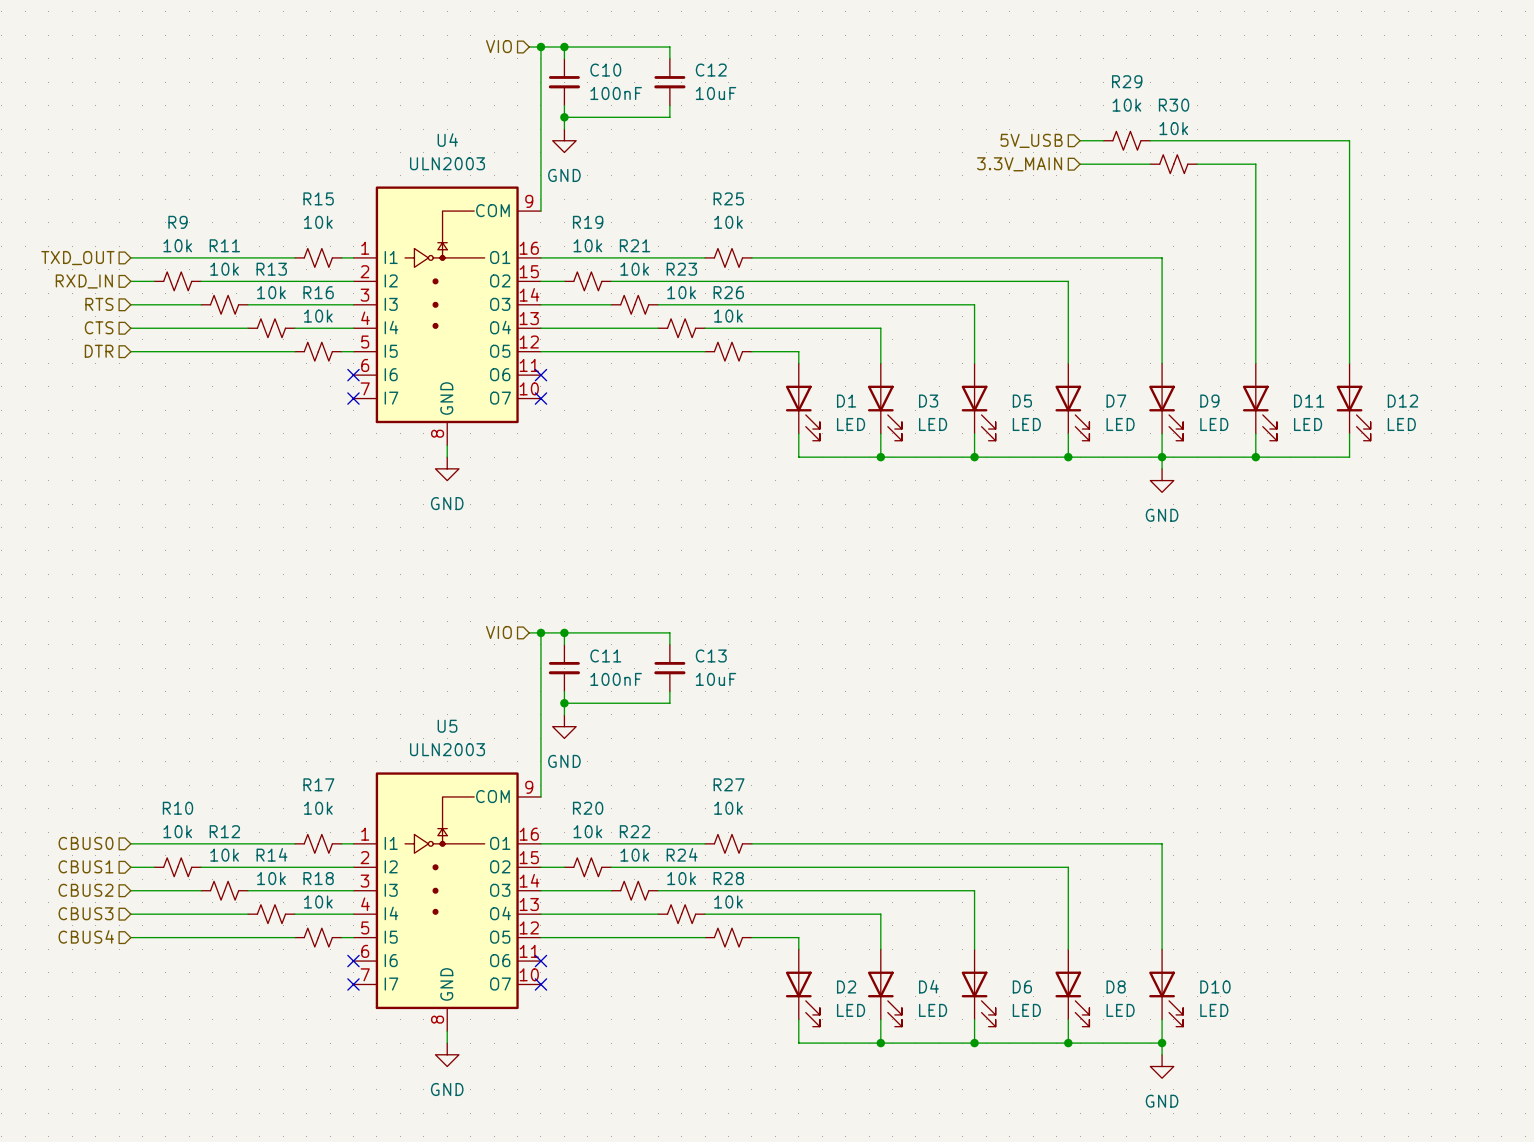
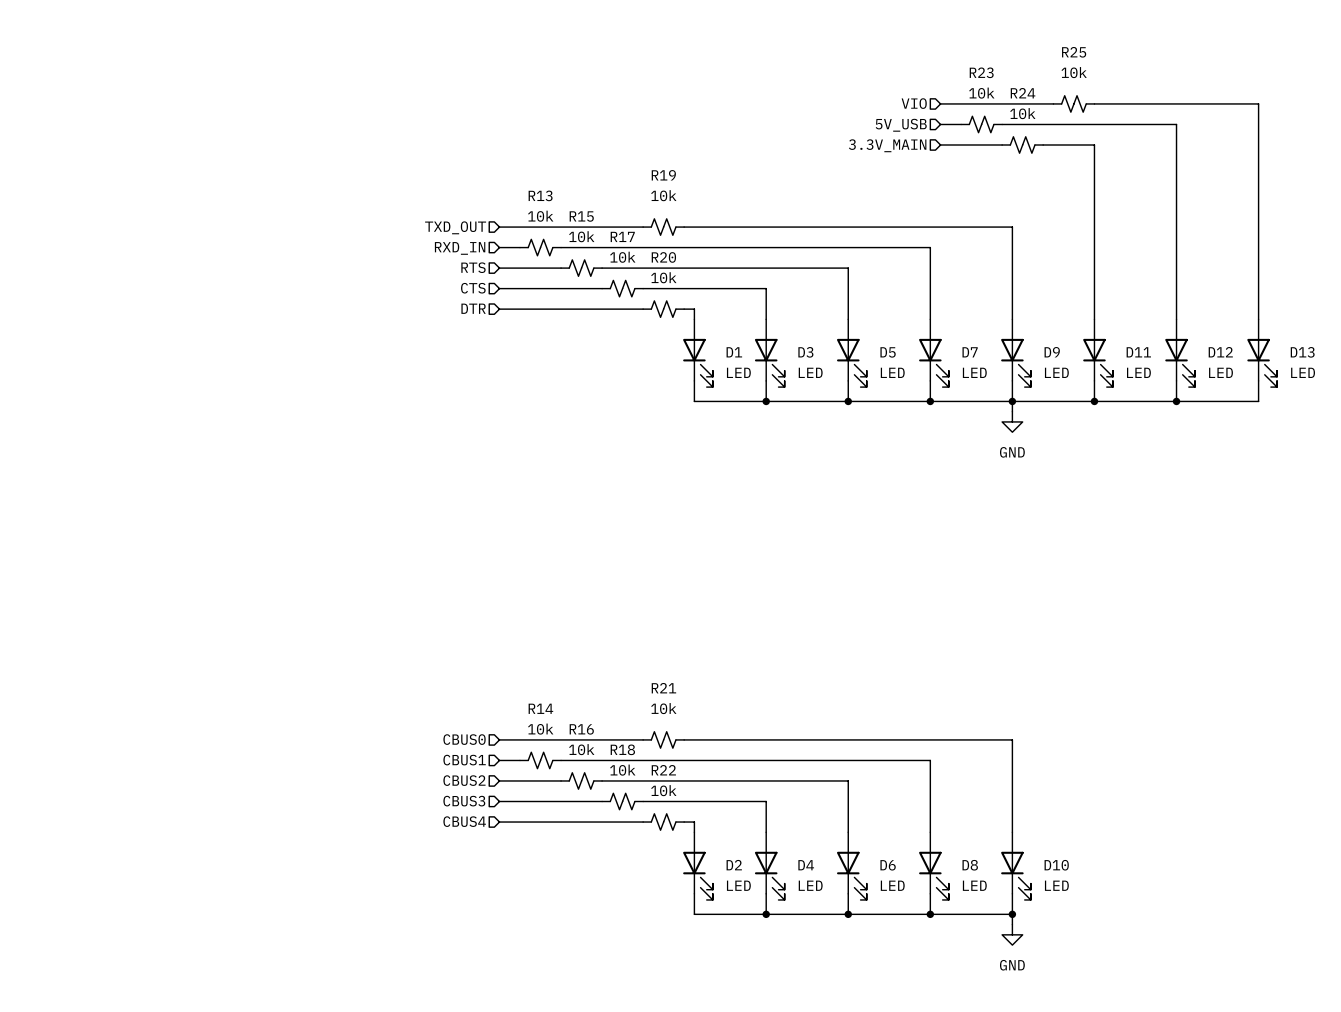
hierarchical label: VIO (498, 46) -> none
wire: (529, 47) (669, 47) (669, 58) -> none
wire: (540, 47) (540, 211) -> none
junction: (540, 47) -> none
wire: (564, 47) (564, 58) -> none
junction: (564, 47) -> none
R29 name: R29 (1127, 81) -> R23 (981, 72)
C10: 100nF (564, 82) -> none
C12: 10uF (669, 82) -> none
wire: (564, 105) (564, 129) -> none
wire: (669, 105) (669, 117) (564, 117) -> none
R30 name: R30 (1174, 105) -> R24 (1023, 93)
hierarchical label: none -> VIO (914, 103)
junction: (564, 117) -> none
wire: none -> (940, 103) (1053, 103)
wire: none -> (1094, 103) (1258, 103) (1258, 319)
power symbol: GND (564, 140) -> none
wire: (130, 257) (294, 257) -> none
R15 position: (318, 257) -> (581, 268)
wire: (341, 257) (353, 257) -> none
wire: (540, 257) (576, 257) -> none
R25 position: (728, 257) -> (1073, 103)
wire: (751, 257) (787, 257) -> (612, 227) (643, 227)
hierarchical label: TXD_OUT (77, 258) -> none
hierarchical label: none -> TXD_OUT (455, 227)
hierarchical label: RXD_IN (84, 281) -> none
wire: (130, 281) (154, 281) -> none
R9: 10k (177, 281) -> none
wire: (201, 281) (353, 281) -> none
hierarchical label: none -> RXD_IN (460, 248)
wire: (540, 281) (564, 281) -> (499, 247) (520, 247)
R19 position: (587, 281) -> (663, 227)
wire: (611, 281) (646, 281) -> none
hierarchical label: RTS (99, 304) -> none
wire: (130, 304) (201, 304) -> none
R11: 10k (224, 304) -> none
wire: (248, 304) (353, 304) -> none
wire: (540, 304) (576, 304) -> none
hierarchical label: none -> RTS (473, 267)
R21 position: (634, 304) -> (663, 739)
wire: (658, 304) (693, 304) -> (530, 268) (561, 268)
U4: ULN2003 (447, 315) -> none
hierarchical label: CTS (99, 327) -> none
hierarchical label: none -> CTS (473, 288)
wire: (130, 328) (248, 328) -> none
R13 position: (271, 328) -> (540, 247)
wire: (294, 328) (353, 328) -> none
wire: (540, 328) (576, 328) -> none
R23: 10k (681, 328) -> none
wire: (705, 328) (740, 328) -> (571, 288) (602, 288)
hierarchical label: DTR (99, 351) -> none
wire: (130, 351) (294, 351) -> none
R16 position: (318, 351) -> (581, 780)
wire: (341, 351) (353, 351) -> none
wire: (540, 351) (576, 351) -> none
hierarchical label: none -> DTR (473, 308)
R26: 10k (728, 351) -> none
wire: (751, 351) (787, 351) -> (612, 309) (643, 309)
no-connect mark: (353, 375) -> none
no-connect mark: (540, 375) -> none
no-connect mark: (353, 398) -> none
no-connect mark: (540, 398) -> none
D13: none -> LED (1262, 353)
wire: none -> (1258, 380) (1258, 401) (1176, 401)
wire: (447, 445) (447, 457) -> none
junction: none -> (1176, 401)
power symbol: GND (447, 468) -> none
hierarchical label: VIO (498, 632) -> none
wire: (529, 632) (669, 632) (669, 644) -> none
wire: (540, 632) (540, 796) -> none
junction: (540, 632) -> none
wire: (564, 632) (564, 644) -> none
junction: (564, 632) -> none
C11: 100nF (564, 668) -> none
C13: 10uF (669, 668) -> none
wire: (564, 691) (564, 714) -> none
wire: (669, 691) (669, 703) (564, 703) -> none
junction: (564, 703) -> none
power symbol: GND (564, 726) -> none
hierarchical label: CBUS0 (86, 843) -> none
wire: (130, 843) (294, 843) -> none
R17 position: (318, 843) -> (622, 288)
wire: (341, 843) (353, 843) -> none
hierarchical label: none -> CBUS0 (464, 739)
wire: (540, 843) (576, 843) -> none
R27: 10k (728, 843) -> none
wire: (751, 843) (787, 843) -> (612, 739) (643, 739)
hierarchical label: CBUS1 (86, 866) -> none
hierarchical label: none -> CBUS1 (464, 760)
wire: (130, 867) (154, 867) -> none
R10: 10k (177, 867) -> none
wire: (201, 867) (353, 867) -> none
wire: (540, 867) (564, 867) -> (499, 760) (520, 760)
R20 position: (587, 867) -> (663, 309)
wire: (611, 867) (646, 867) -> none
hierarchical label: CBUS2 (86, 890) -> none
wire: (130, 890) (201, 890) -> none
R12: 10k (224, 890) -> none
wire: (248, 890) (353, 890) -> none
hierarchical label: none -> CBUS2 (464, 780)
wire: (540, 890) (576, 890) -> none
R22 position: (634, 890) -> (663, 822)
wire: (658, 890) (693, 890) -> (530, 780) (561, 780)
U5: ULN2003 (447, 901) -> none
hierarchical label: CBUS3 (86, 913) -> none
hierarchical label: none -> CBUS3 (464, 801)
wire: (130, 914) (248, 914) -> none
R14 position: (271, 914) -> (540, 760)
wire: (294, 914) (353, 914) -> none
wire: (540, 914) (576, 914) -> none
R24: 10k (681, 914) -> none
wire: (705, 914) (740, 914) -> (571, 801) (602, 801)
hierarchical label: CBUS4 (86, 936) -> none
hierarchical label: none -> CBUS4 (464, 821)
wire: (130, 937) (294, 937) -> none
R18 position: (318, 937) -> (622, 801)
wire: (341, 937) (353, 937) -> none
wire: (540, 937) (576, 937) -> none
R28: 10k (728, 937) -> none
wire: (751, 937) (787, 937) -> (612, 822) (643, 822)
no-connect mark: (353, 961) -> none
no-connect mark: (540, 961) -> none
no-connect mark: (353, 984) -> none
no-connect mark: (540, 984) -> none
wire: (447, 1031) (447, 1043) -> none
power symbol: GND (447, 1054) -> none

